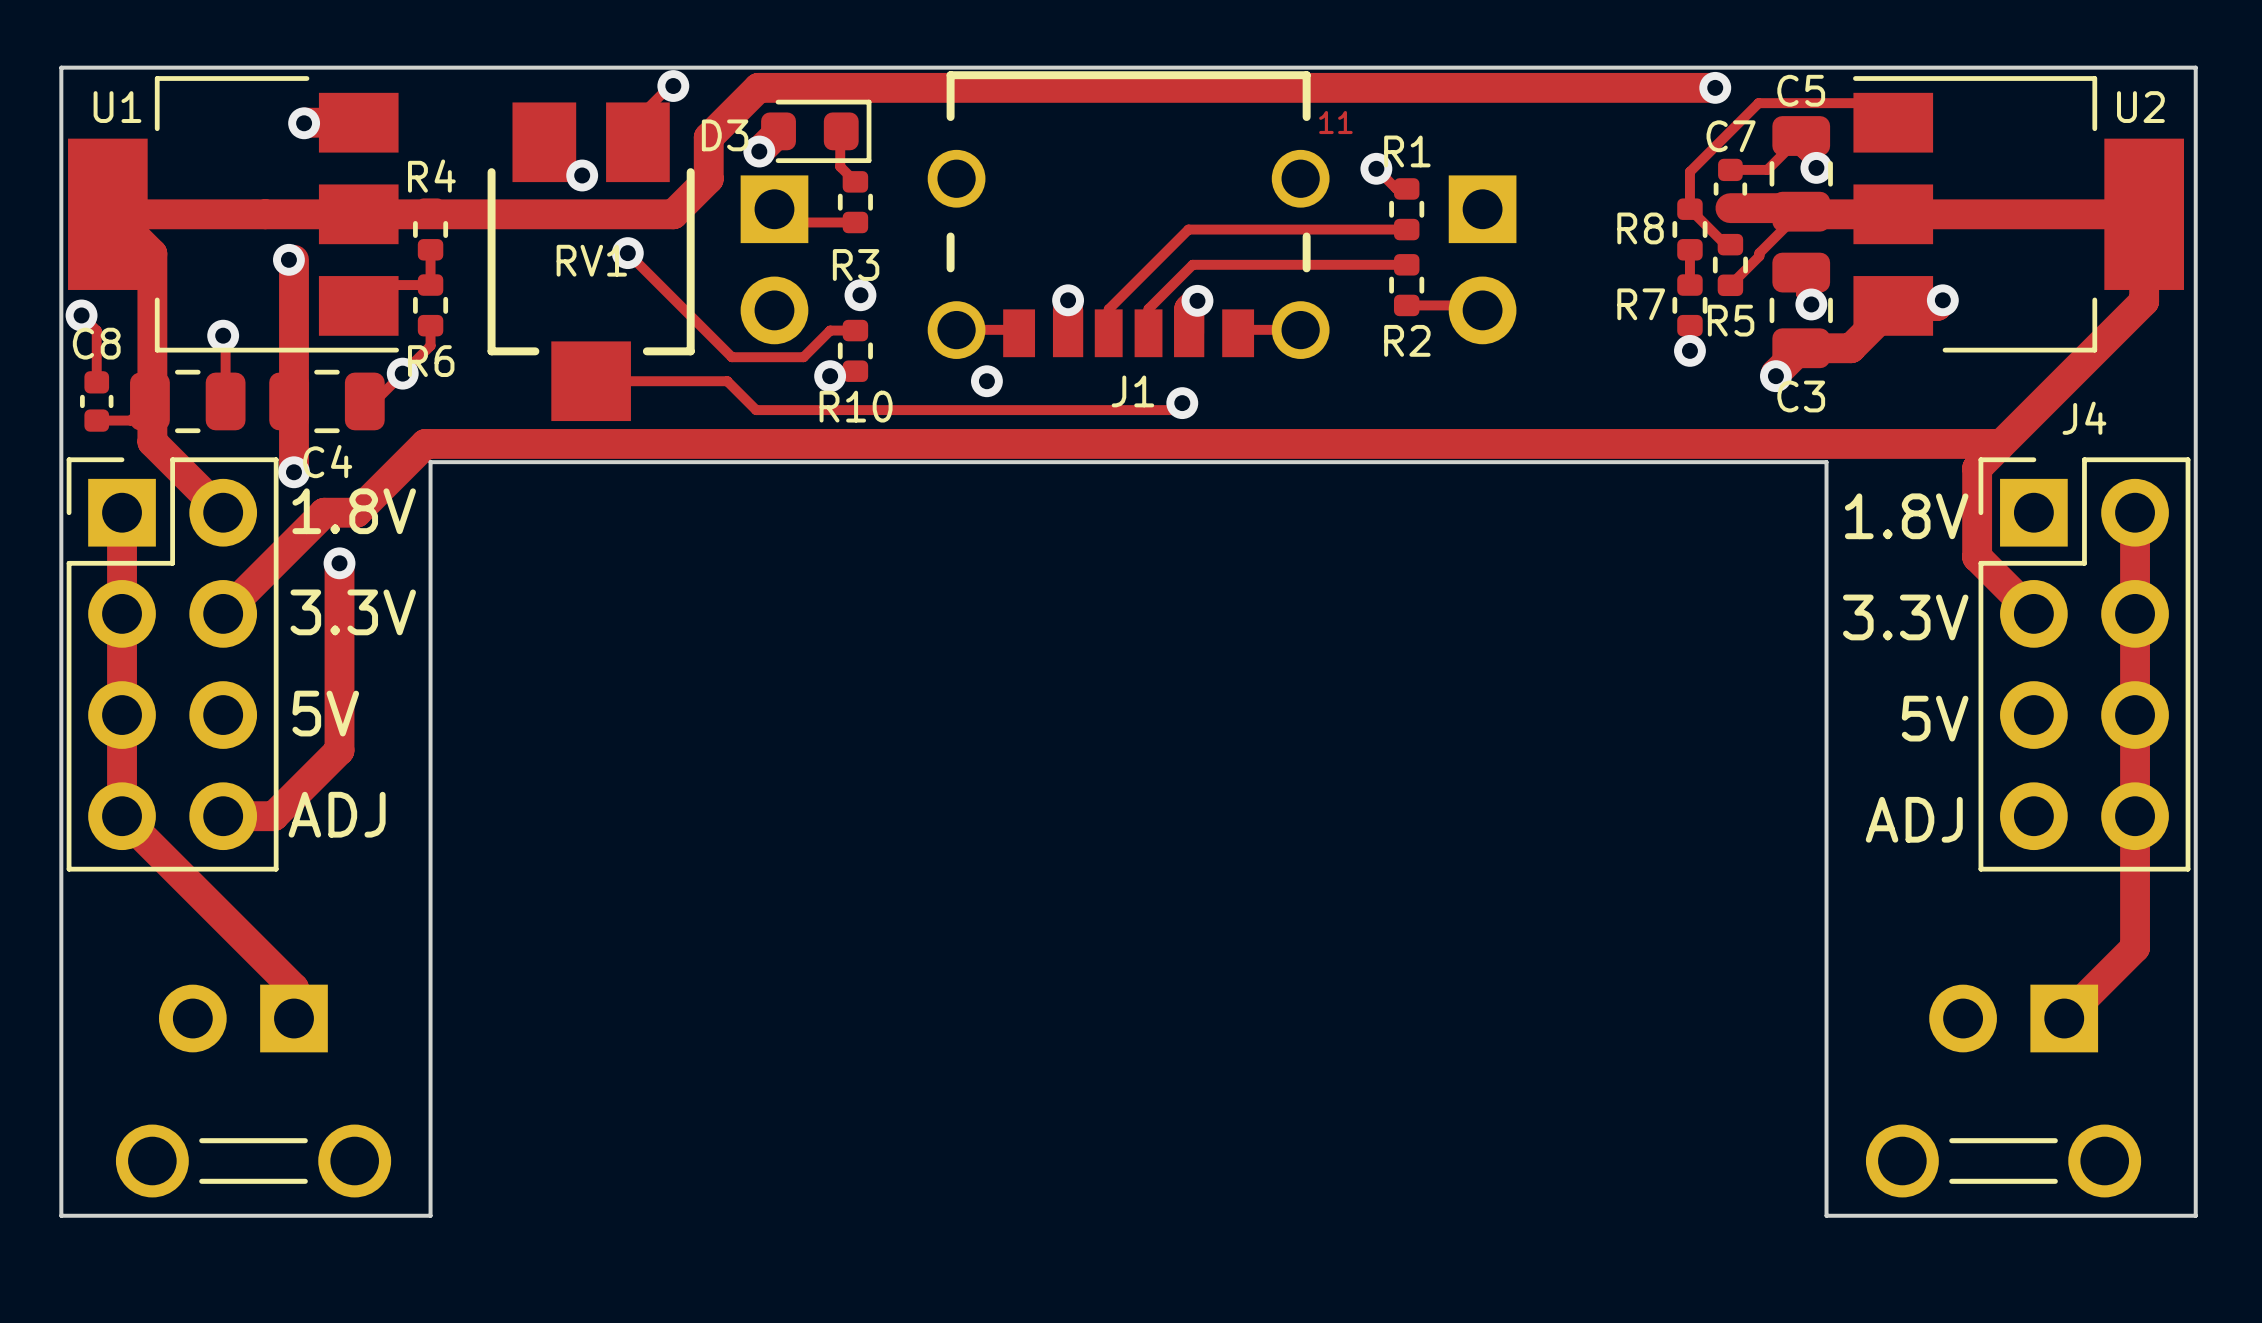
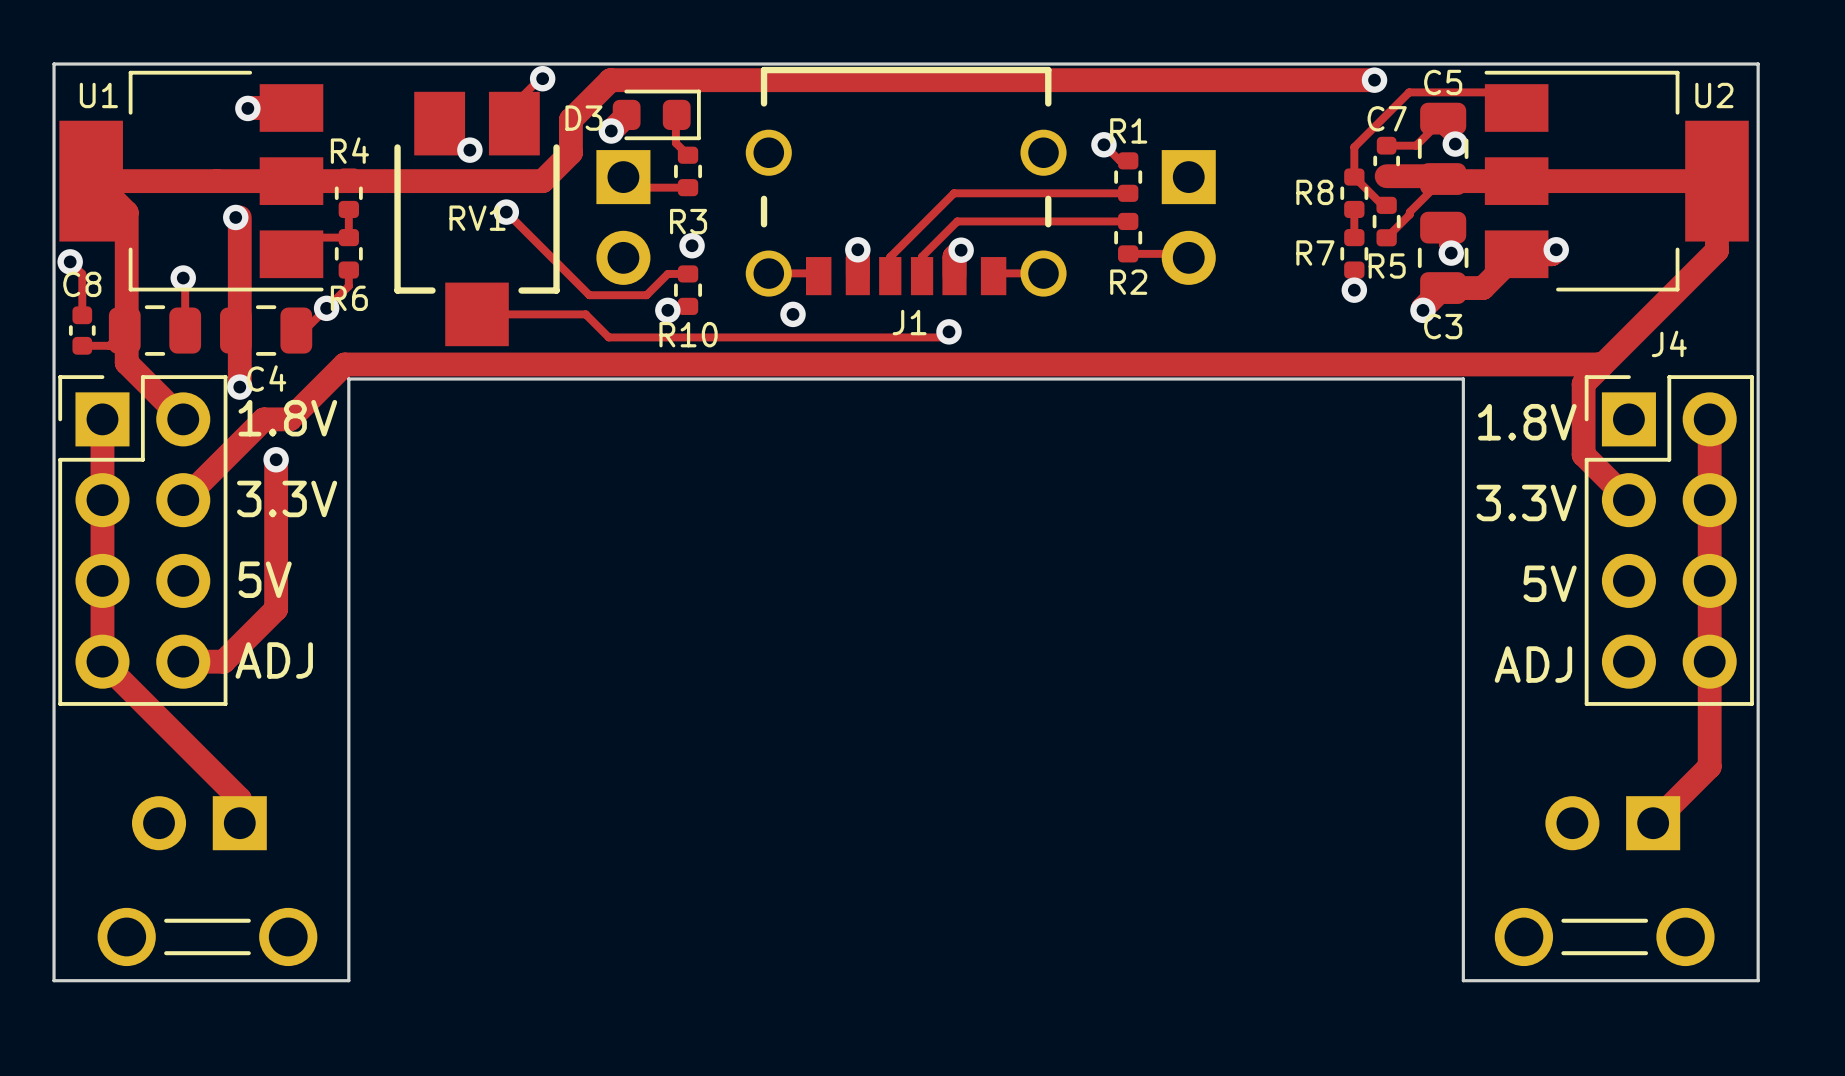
text: 11 (1335, 122) -> none

